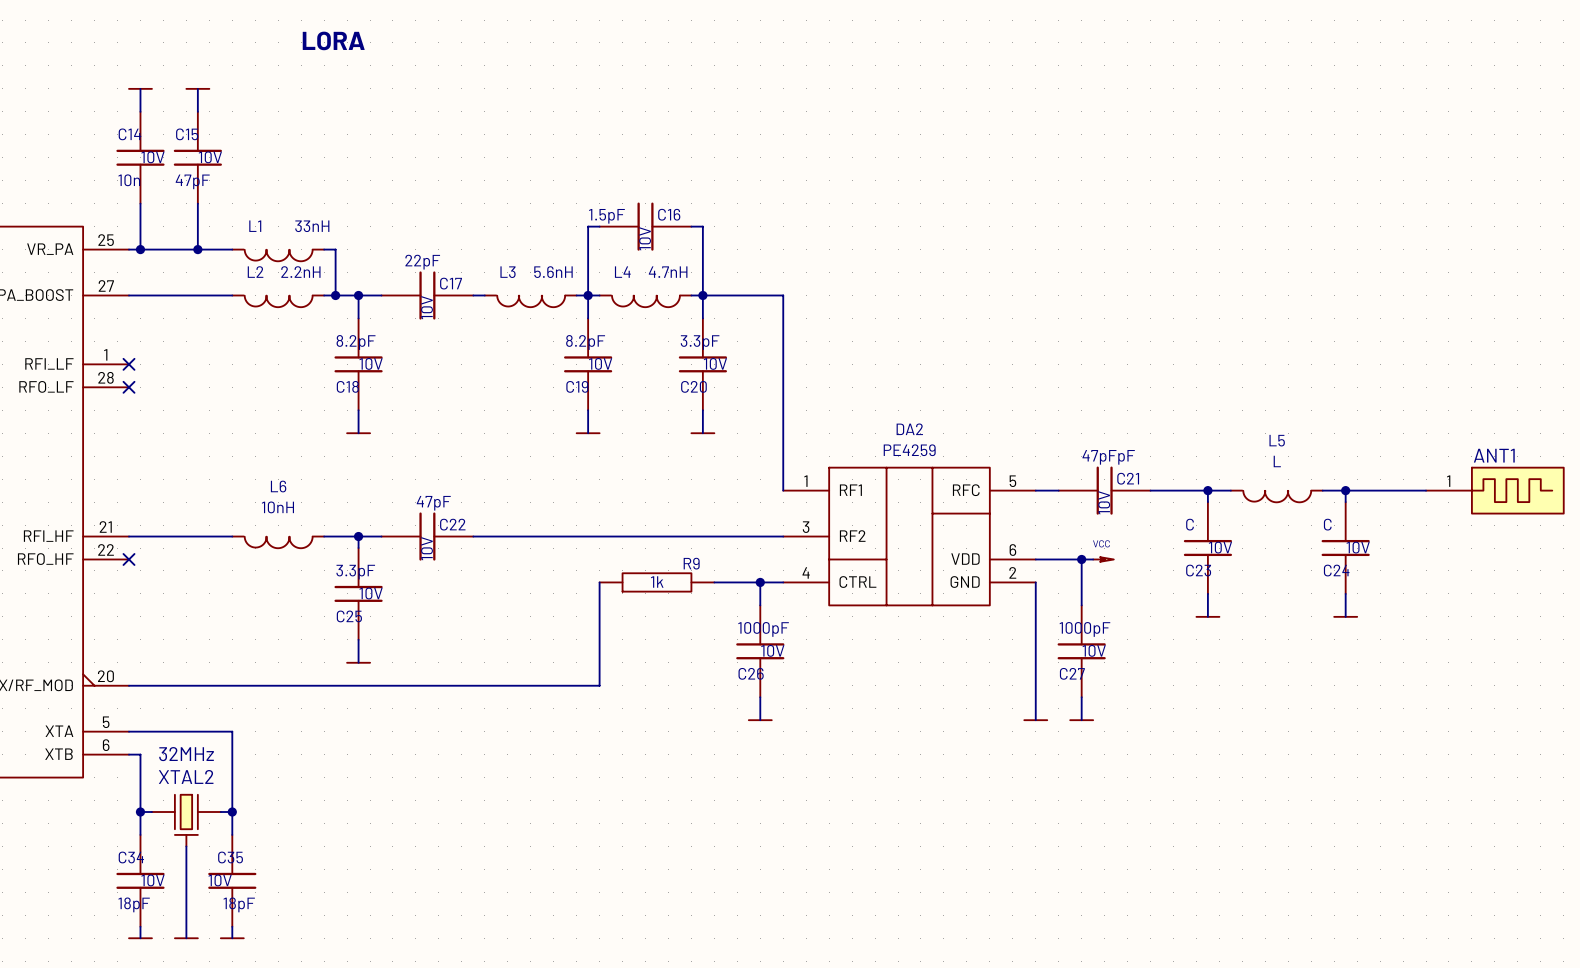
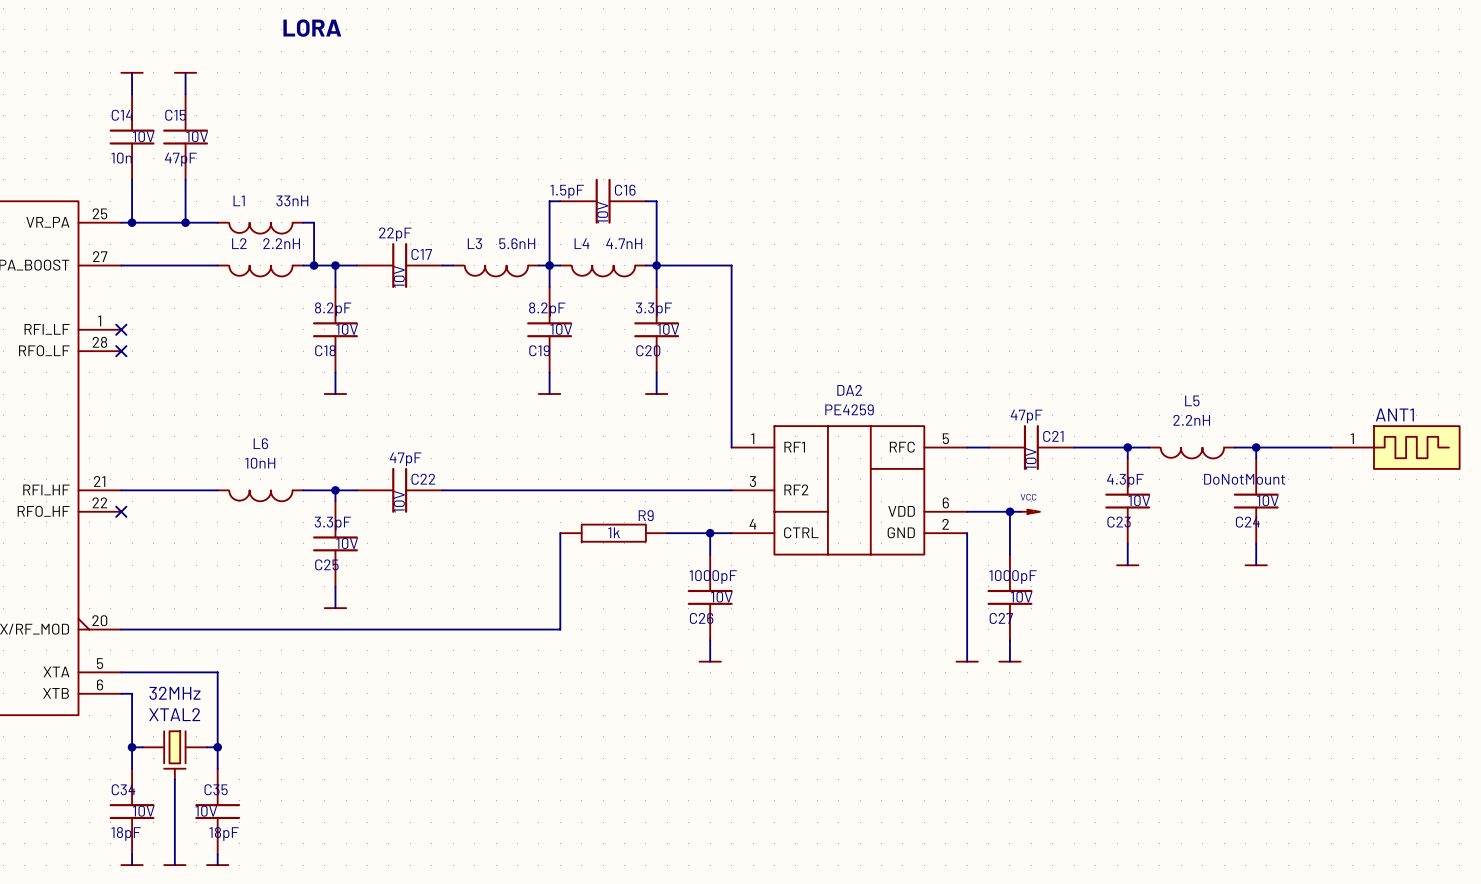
C21 value: 47pFpF (1108, 457) -> 47pF (1026, 416)
L5 value: L (1277, 461) -> 2.2nH (1191, 420)
C23 value: C (1190, 524) -> 4.3pF (1125, 480)
C24 value: C (1327, 524) -> DoNotMount (1244, 479)

